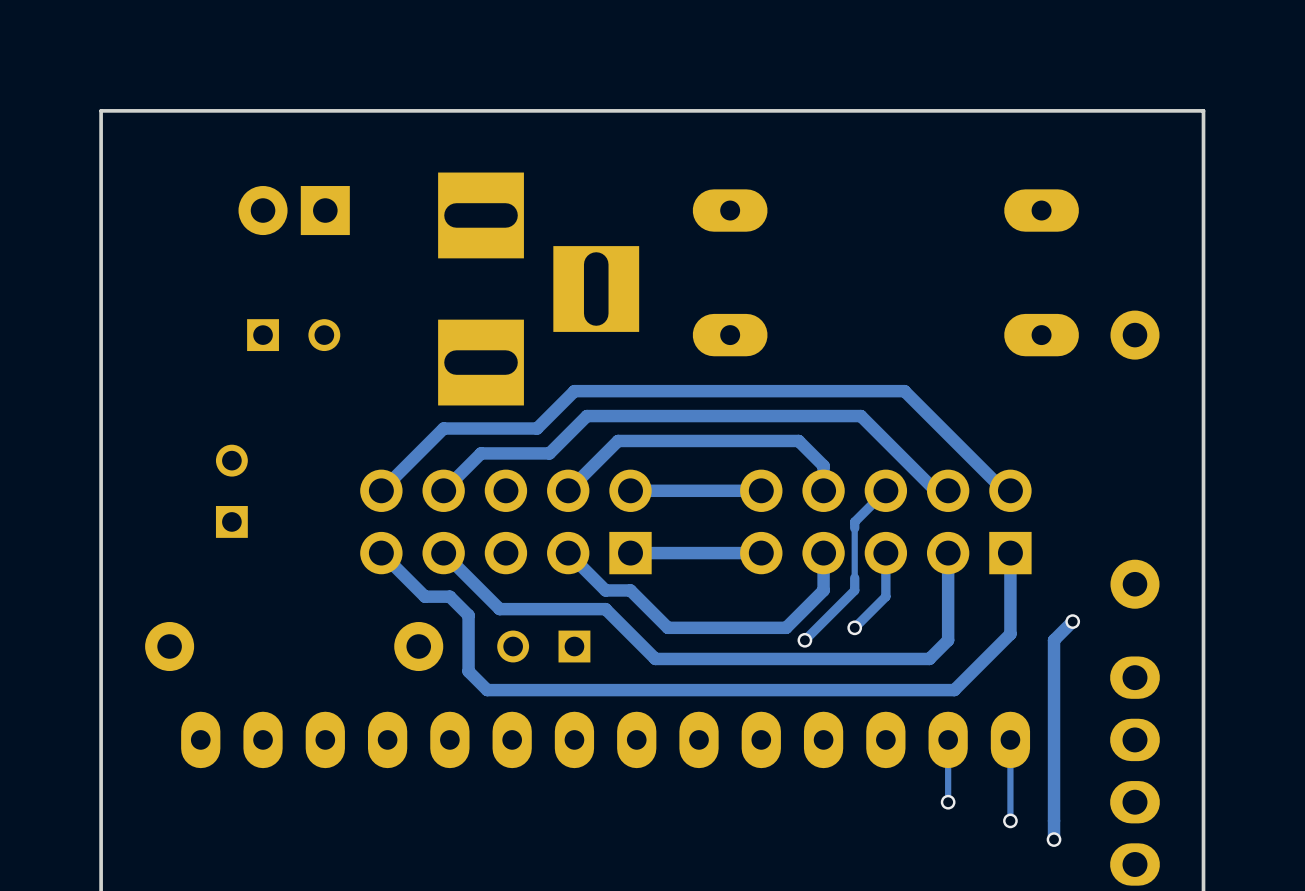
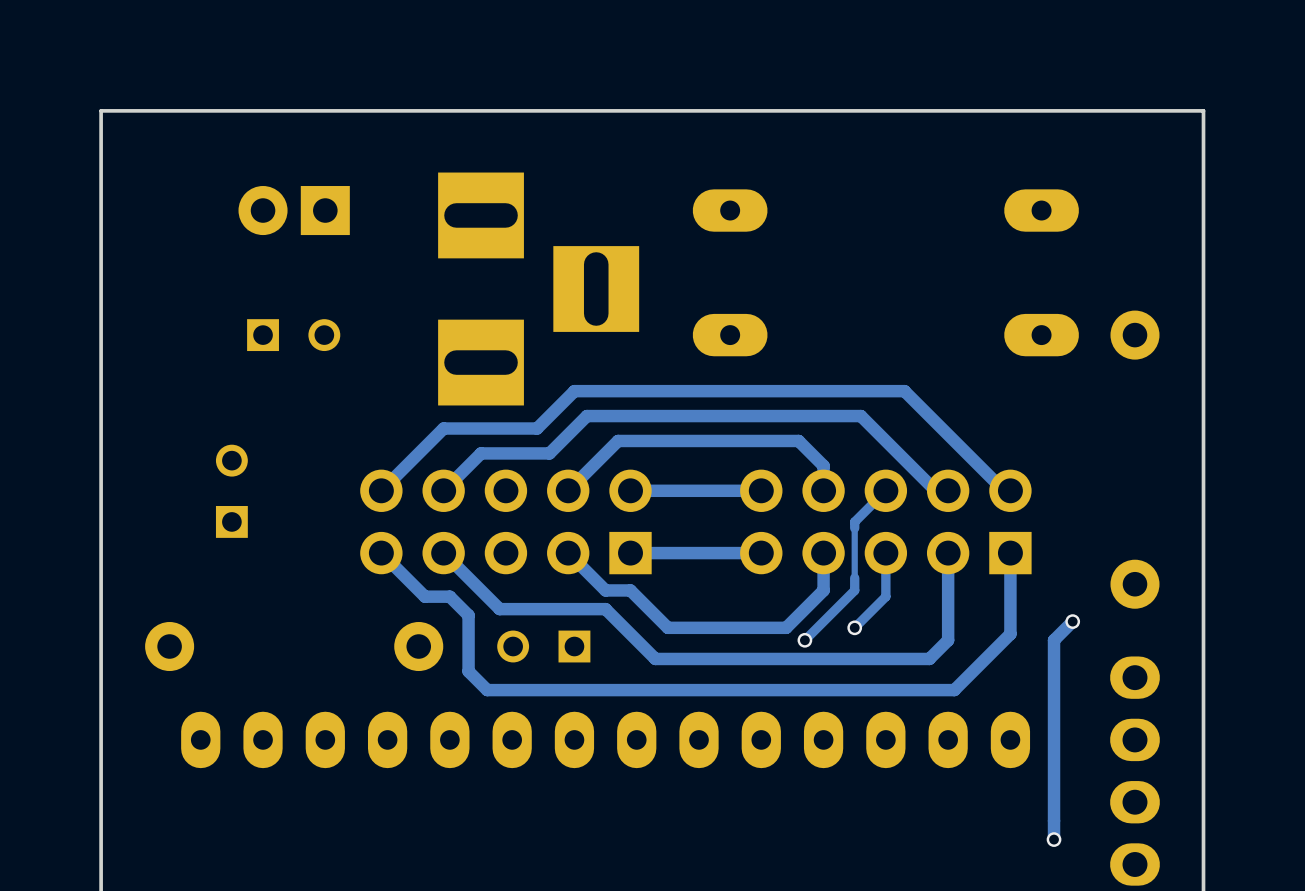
track: (948, 739) (948, 802) -> none
track: (1010, 739) (1010, 820) -> none
via: (948, 802) -> none
via: (1010, 820) -> none

